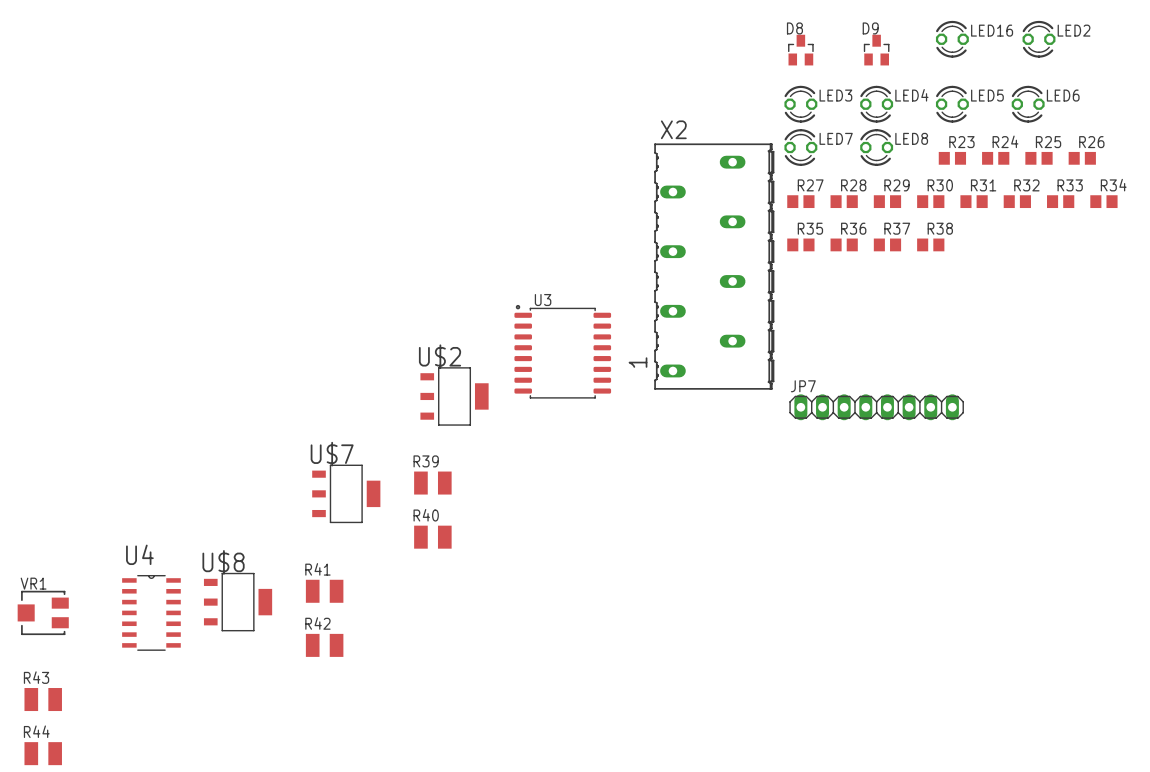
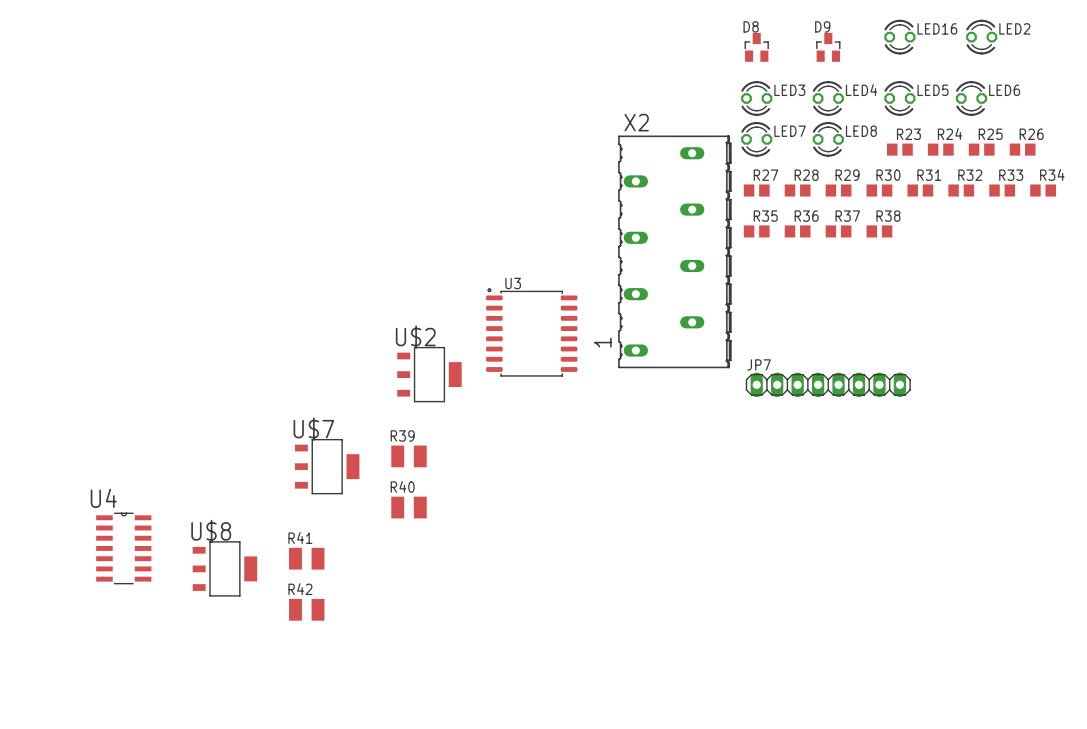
U4 footprint: [122, 575, 181, 651] -> [96, 512, 152, 585]
VR1: (43, 612) -> none
R43: (43, 699) -> none
R44: (43, 753) -> none

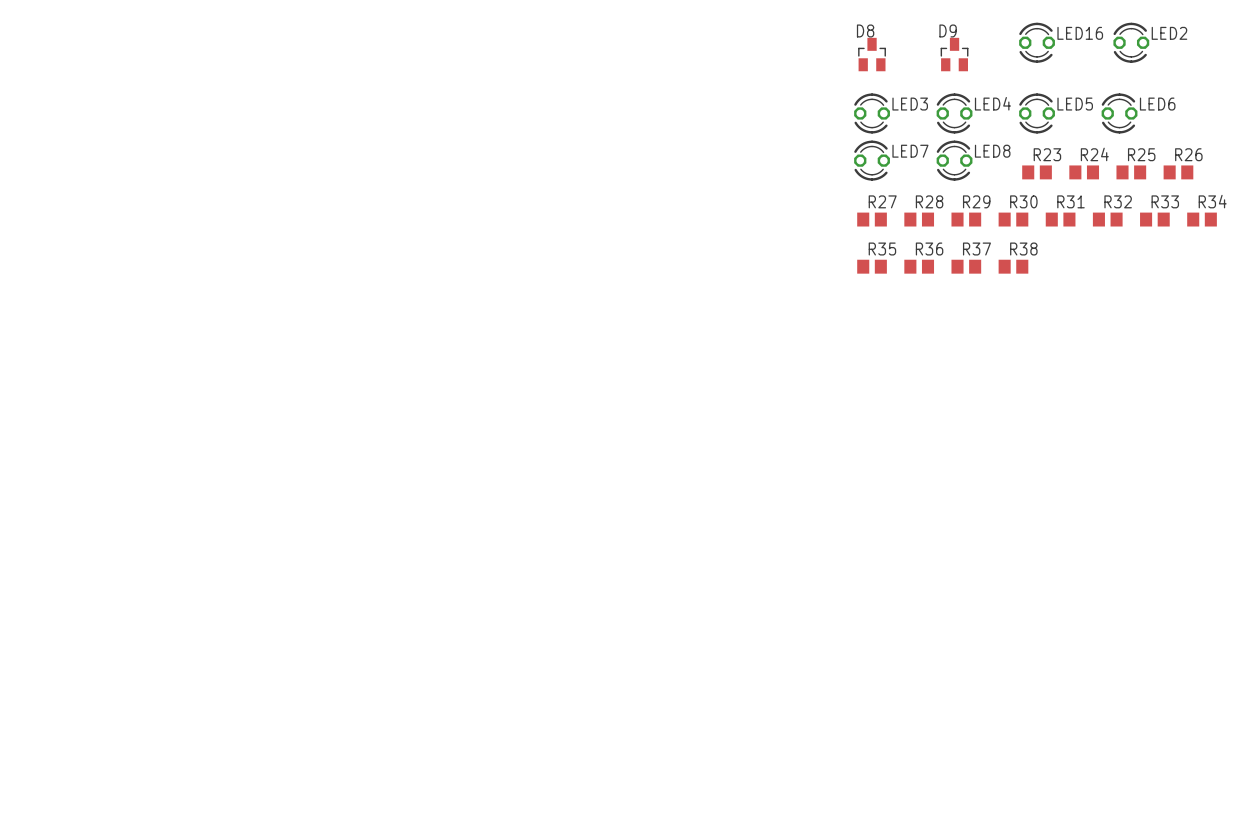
X2: (674, 251) -> none
U3: (531, 332) -> none
U$2: (429, 374) -> none
JP7: (828, 384) -> none
R39: (409, 456) -> none
U$7: (327, 466) -> none
R40: (409, 507) -> none
U4: (123, 548) -> none
R41: (306, 558) -> none
U$8: (224, 568) -> none
R42: (306, 609) -> none

